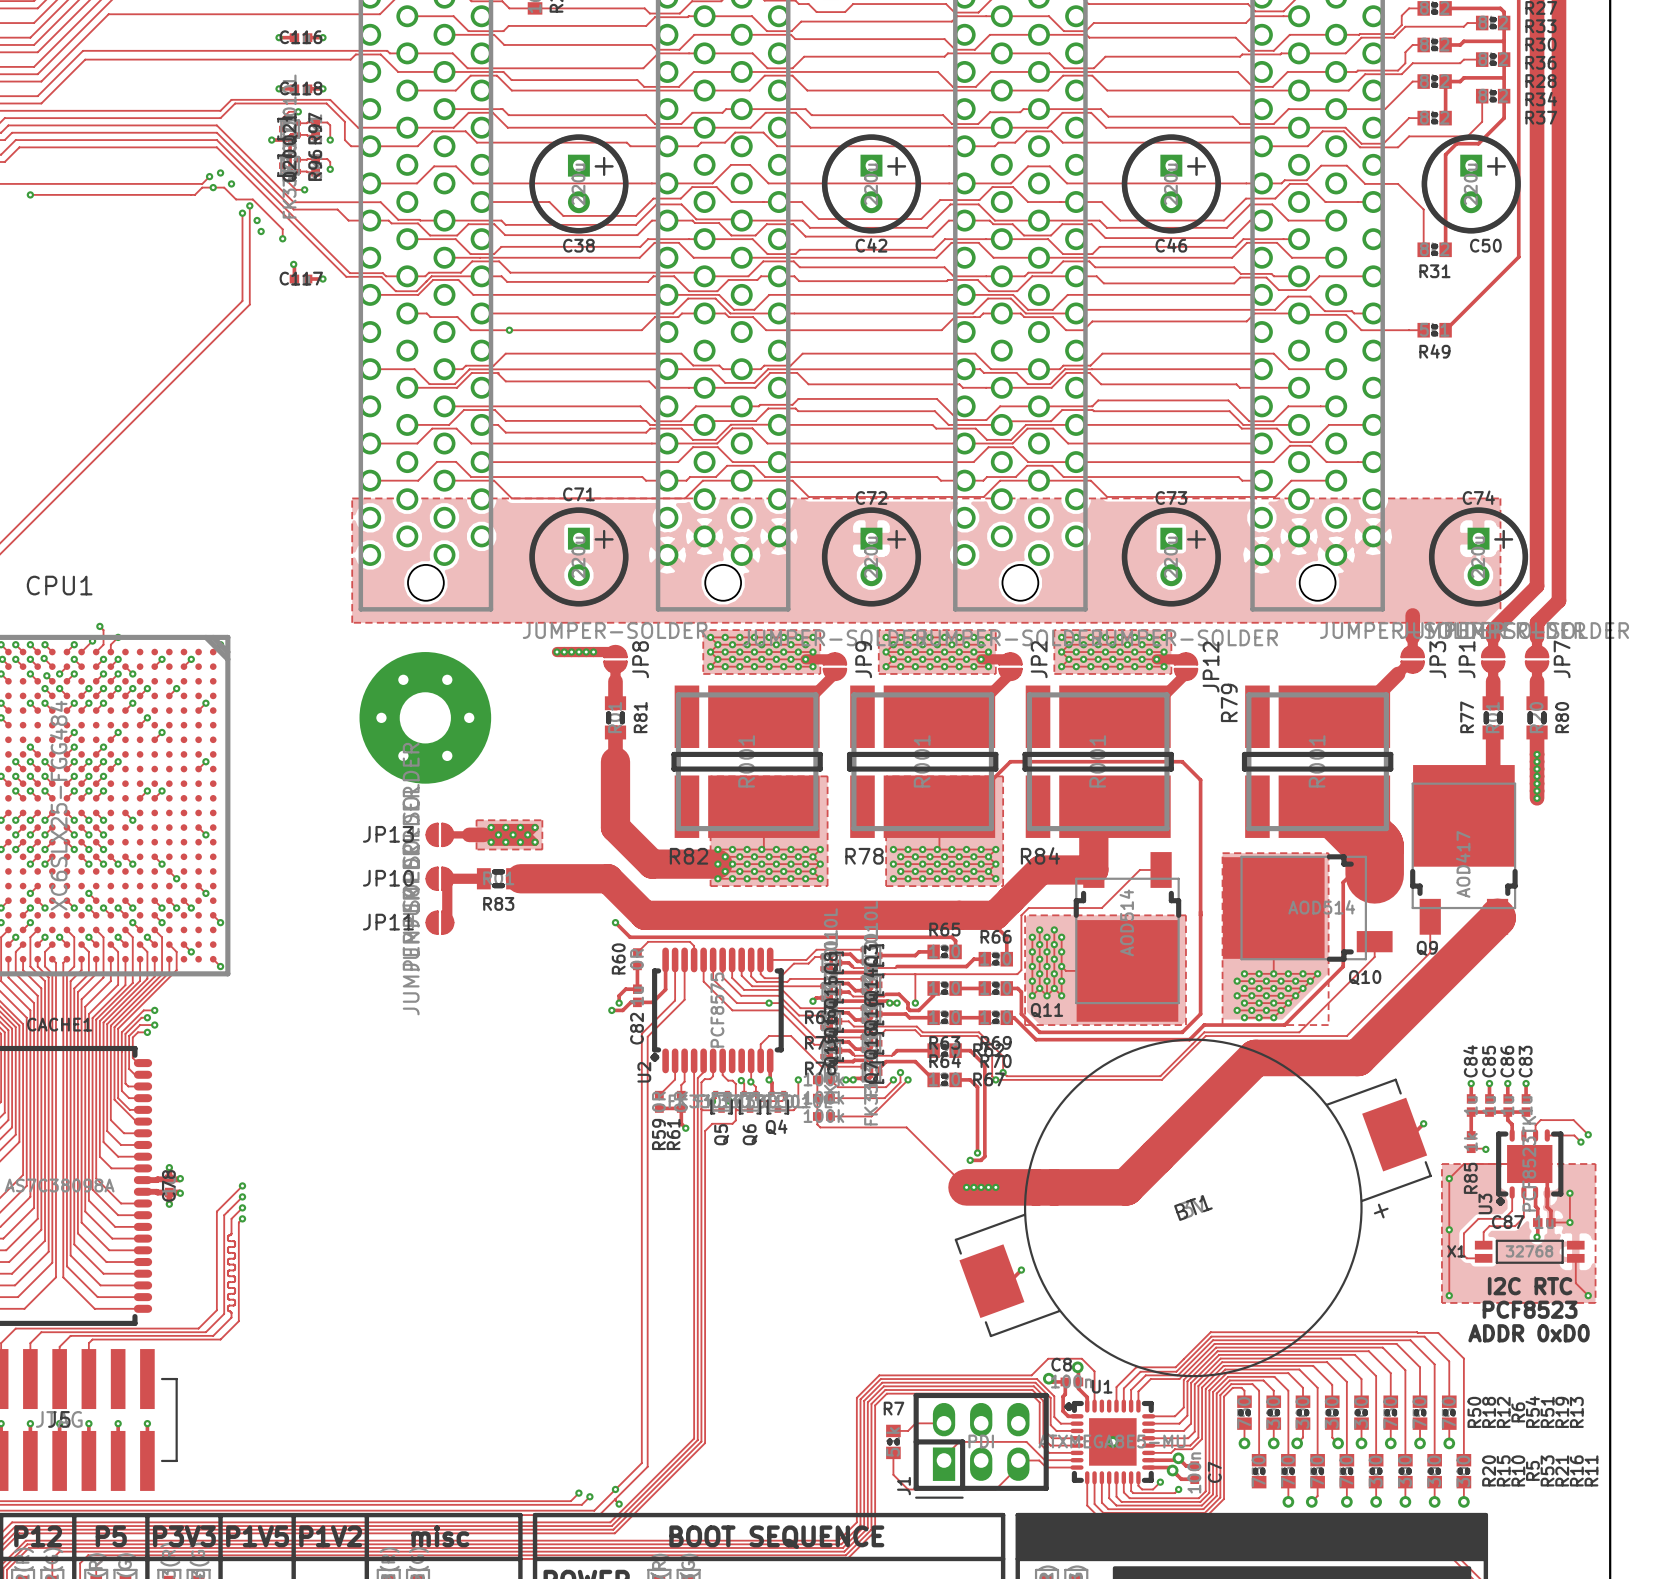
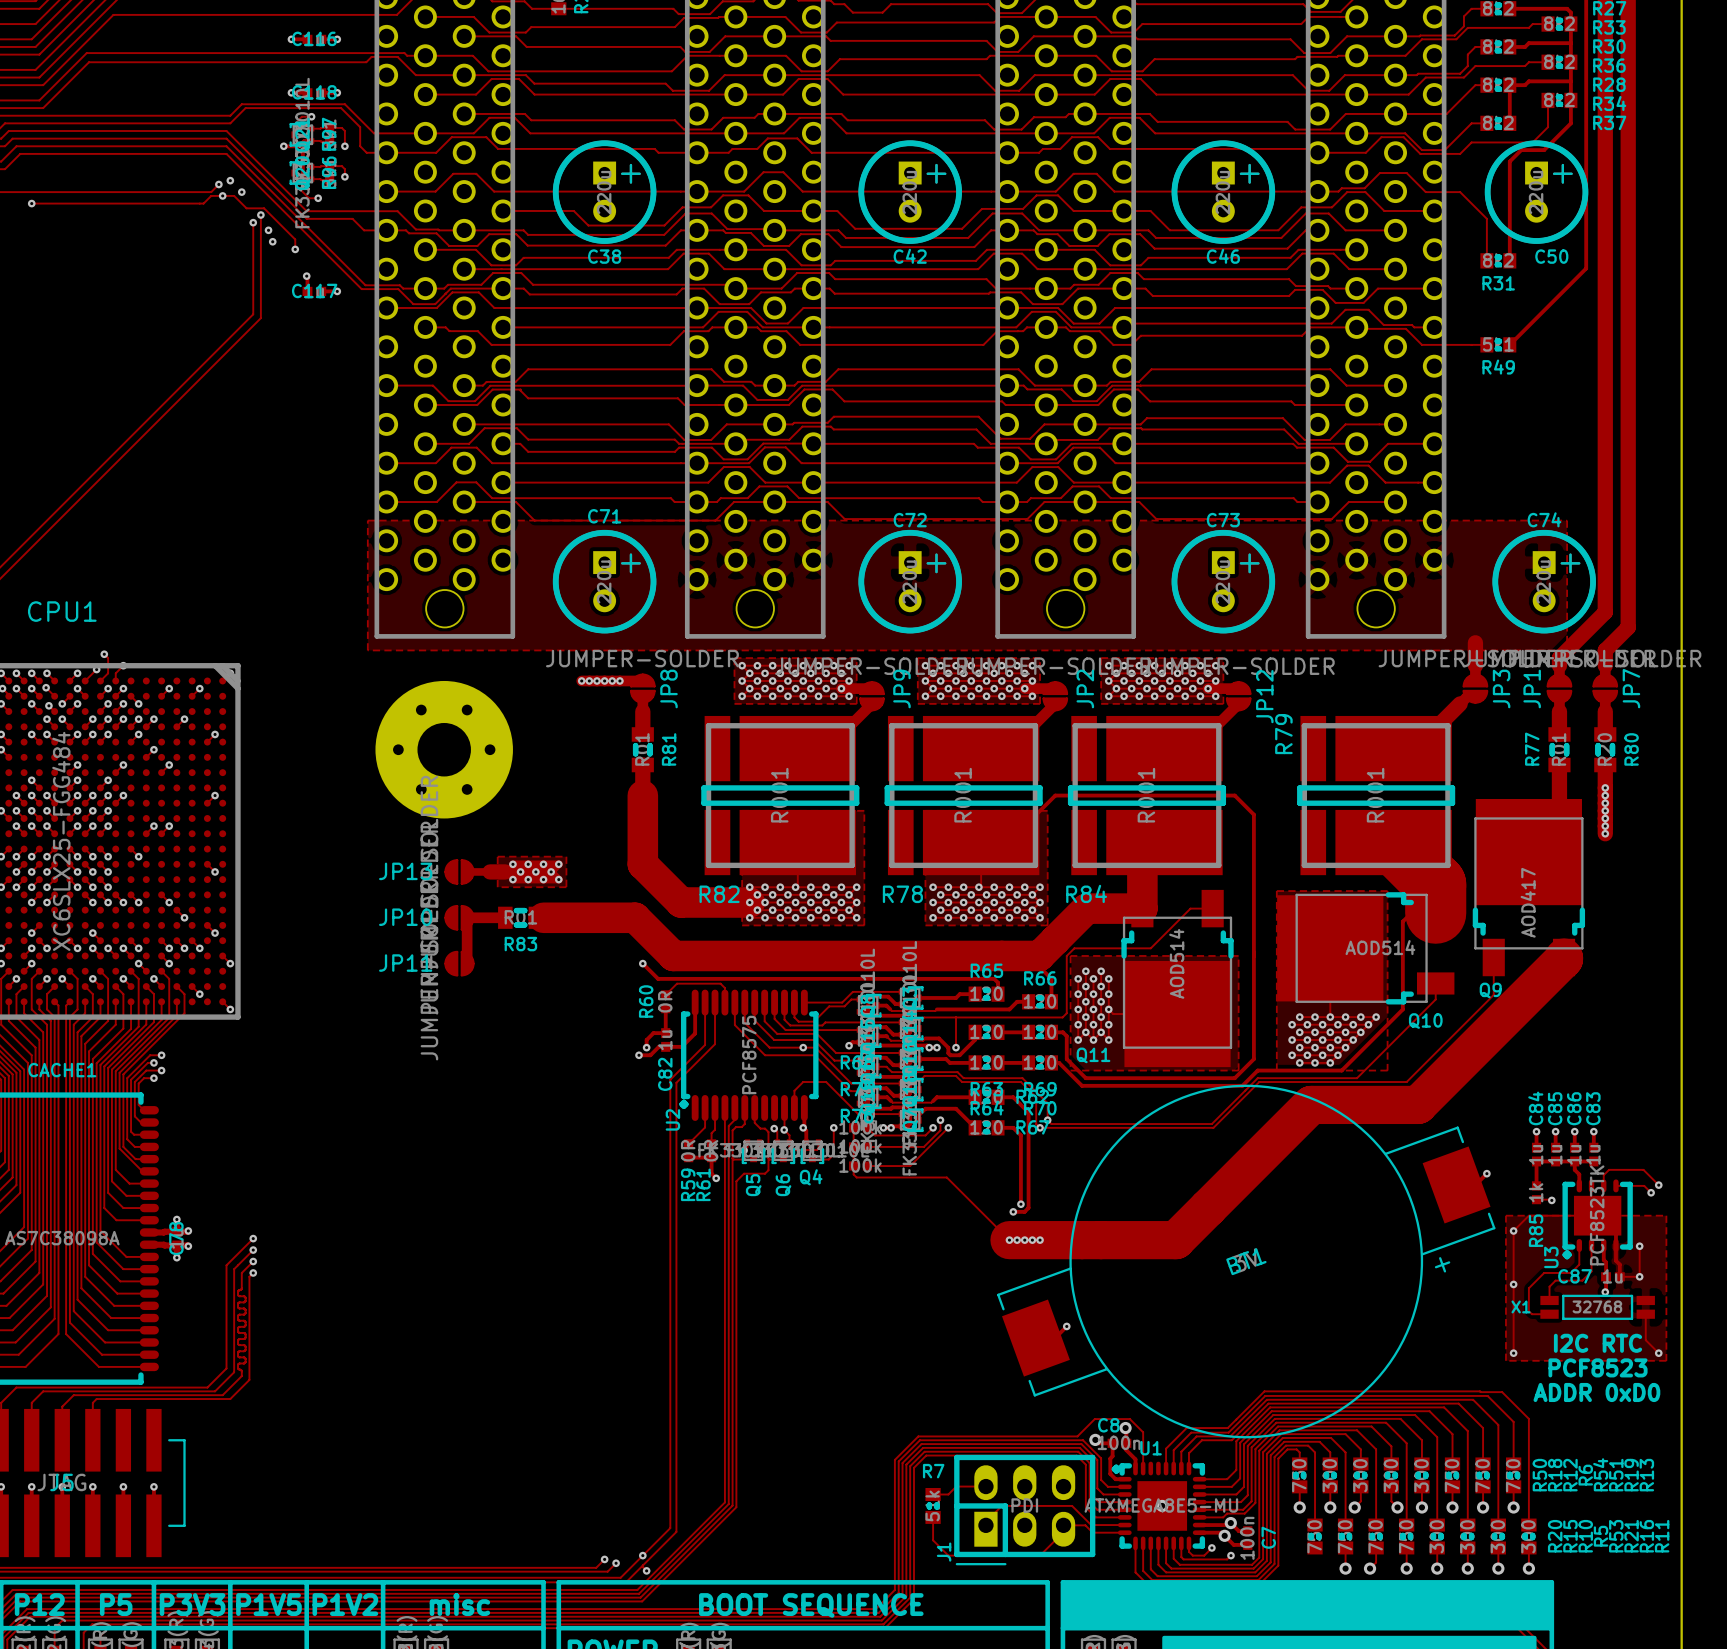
via: (509, 330) -> none

